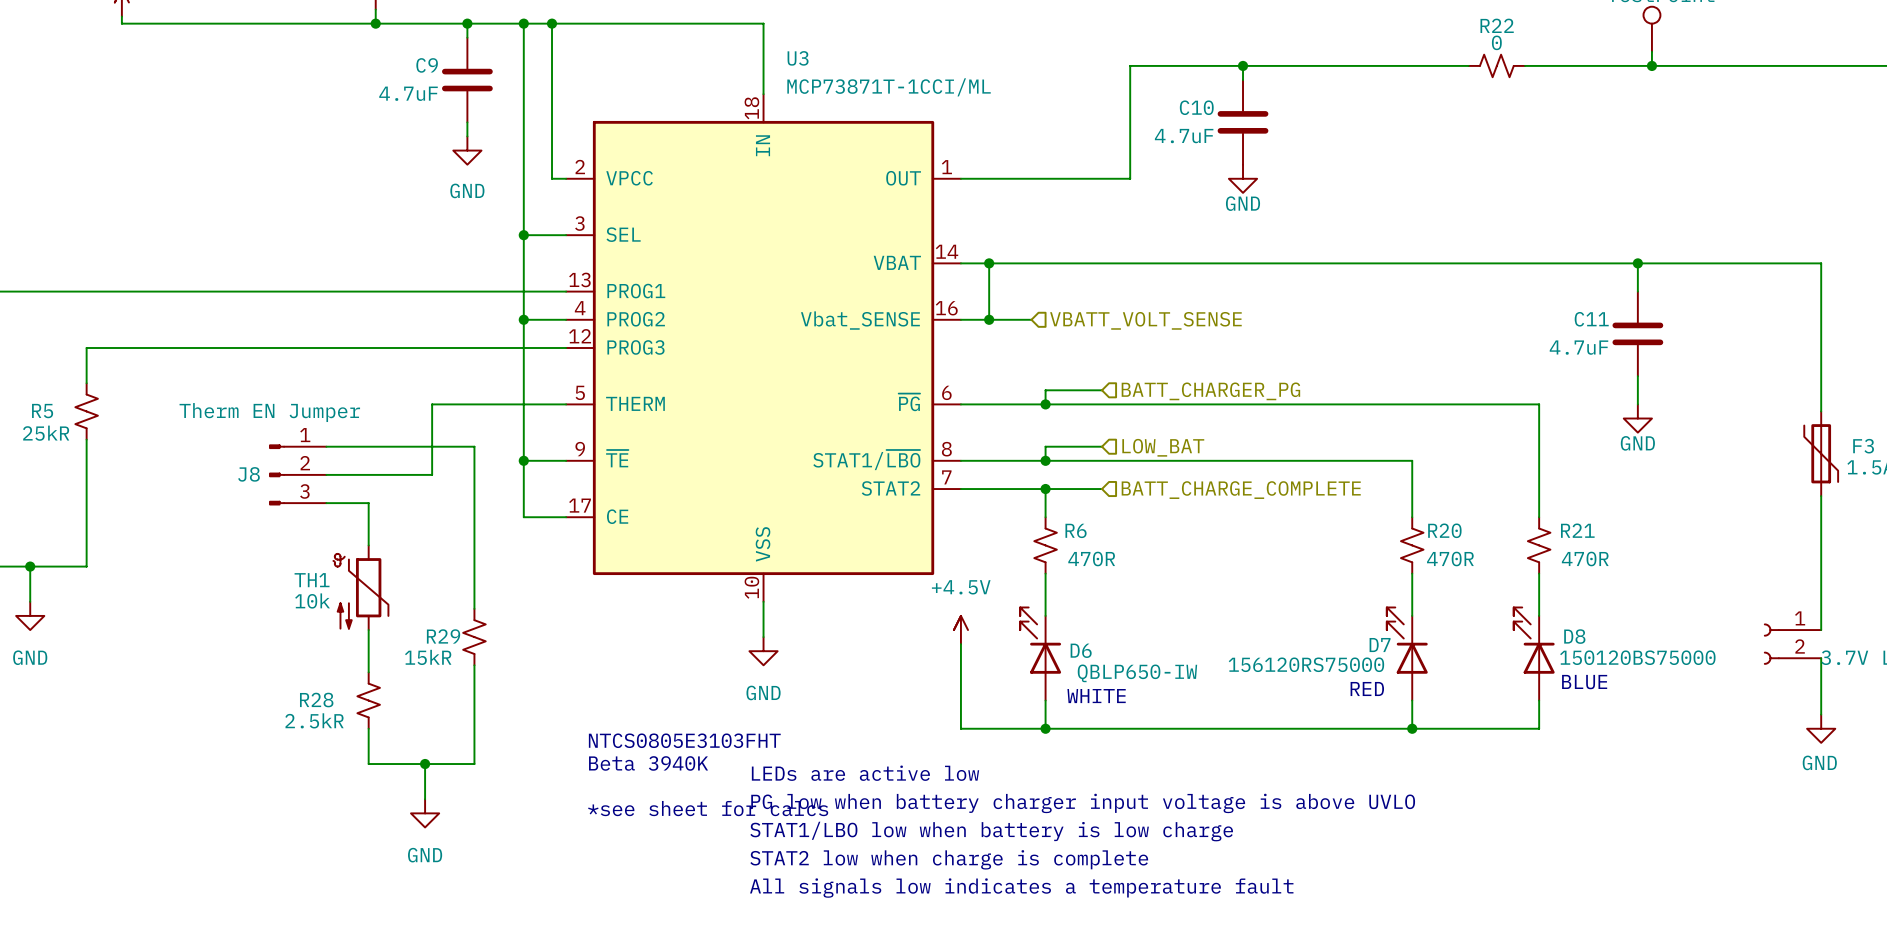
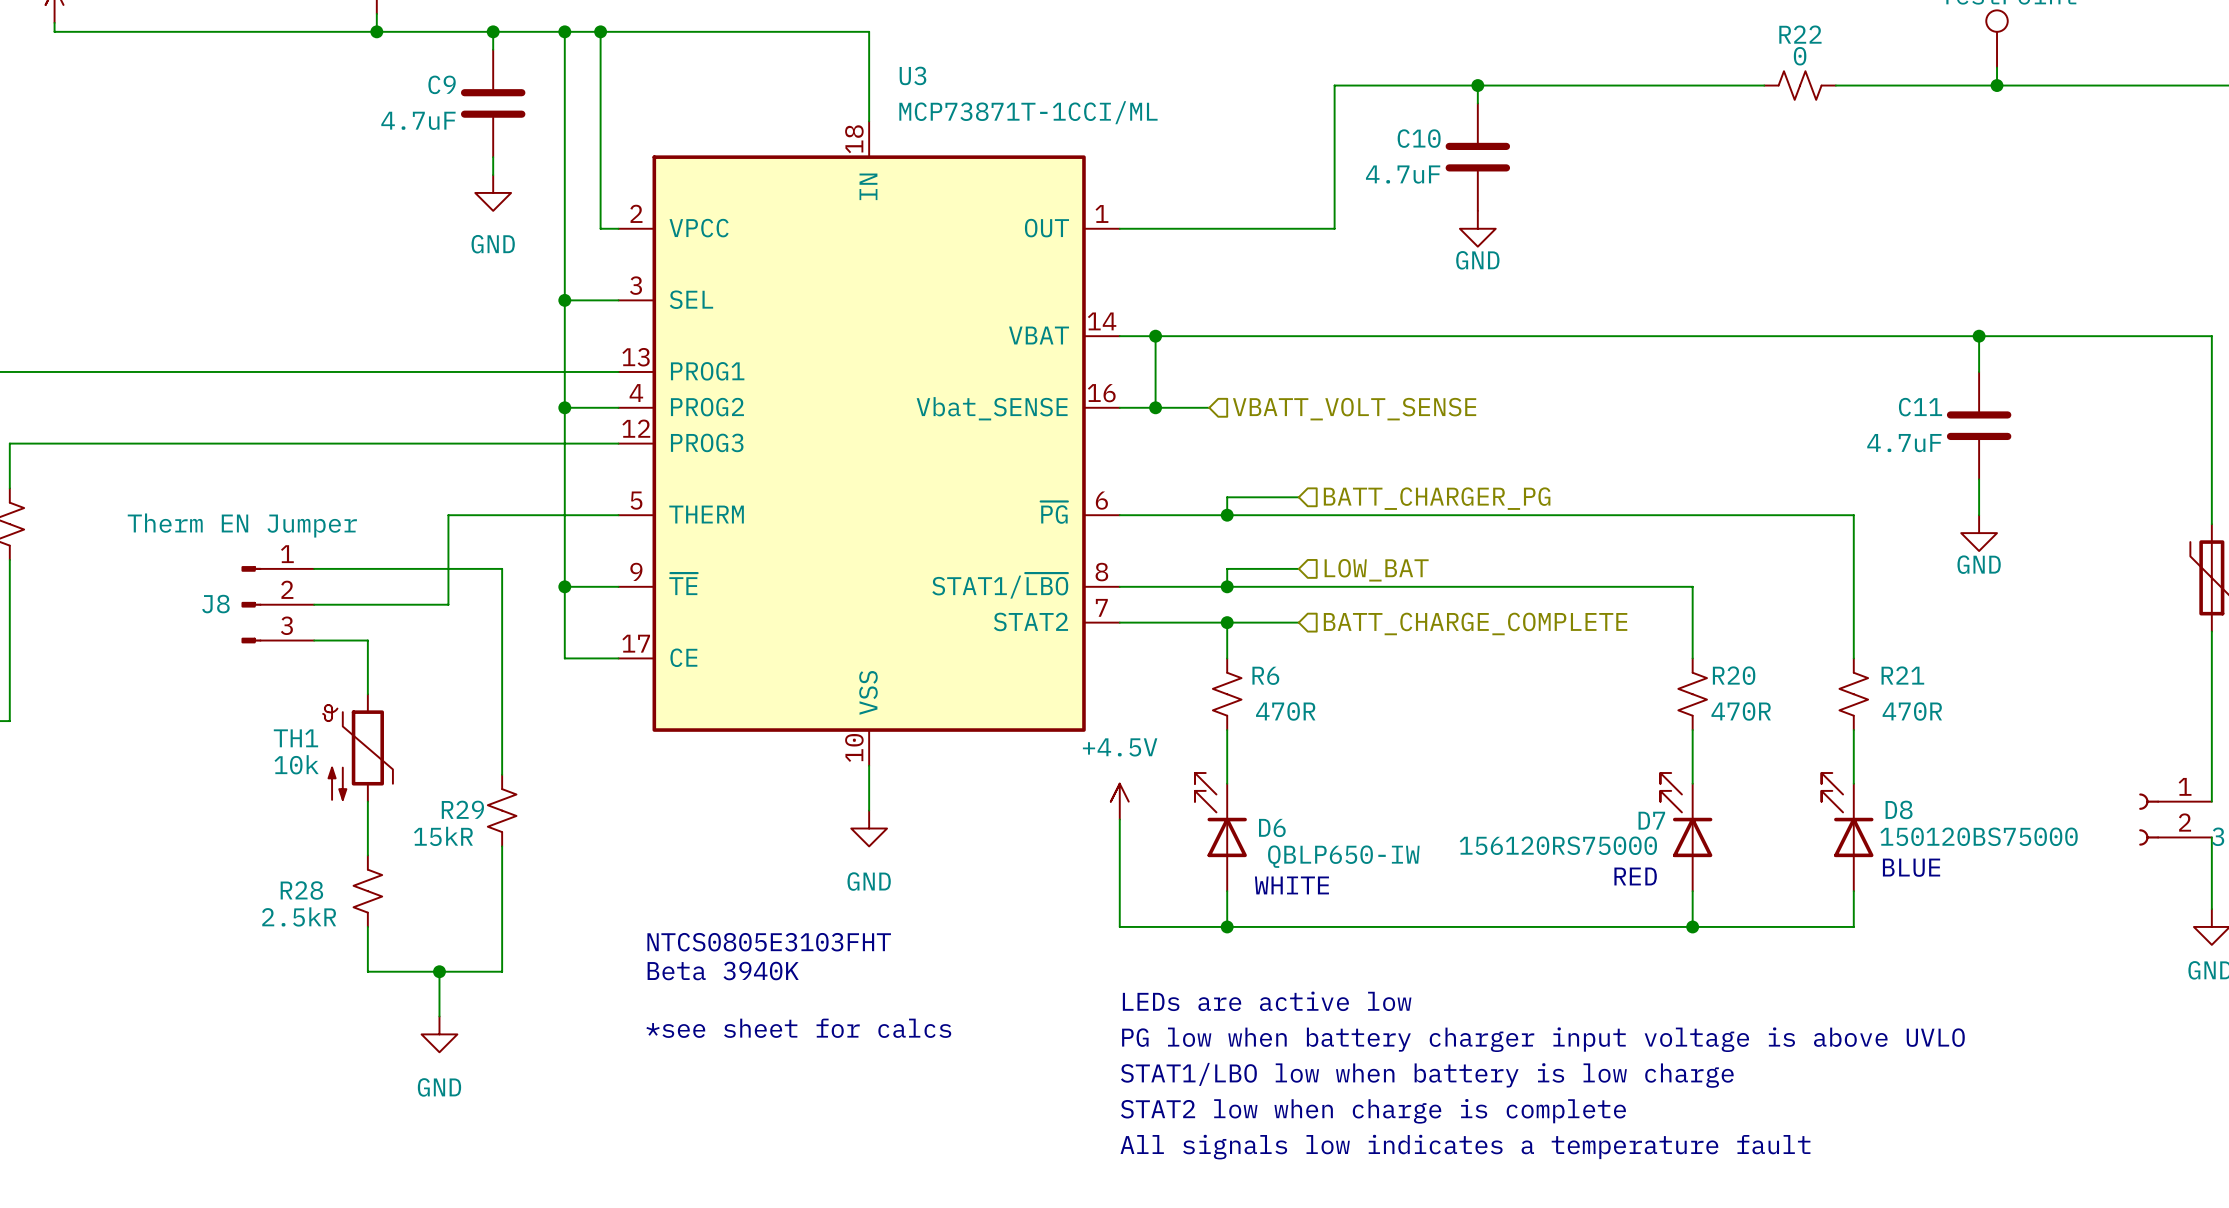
text position: LEDs are active low (865, 773) -> LEDs are active low (1267, 1001)
text position: PG low when battery charger input voltage is above UVLO (1083, 803) -> PG low when battery charger input voltage is above UVLO (1543, 1039)
text position: STAT1/LBO low when battery is low charge (991, 831) -> STAT1/LBO low when battery is low charge (1427, 1075)
text position: STAT2 low when charge is complete (949, 859) -> STAT2 low when charge is complete (1373, 1111)
text position: All signals low indicates a temperature fault (1021, 888) -> All signals low indicates a temperature fault (1465, 1147)

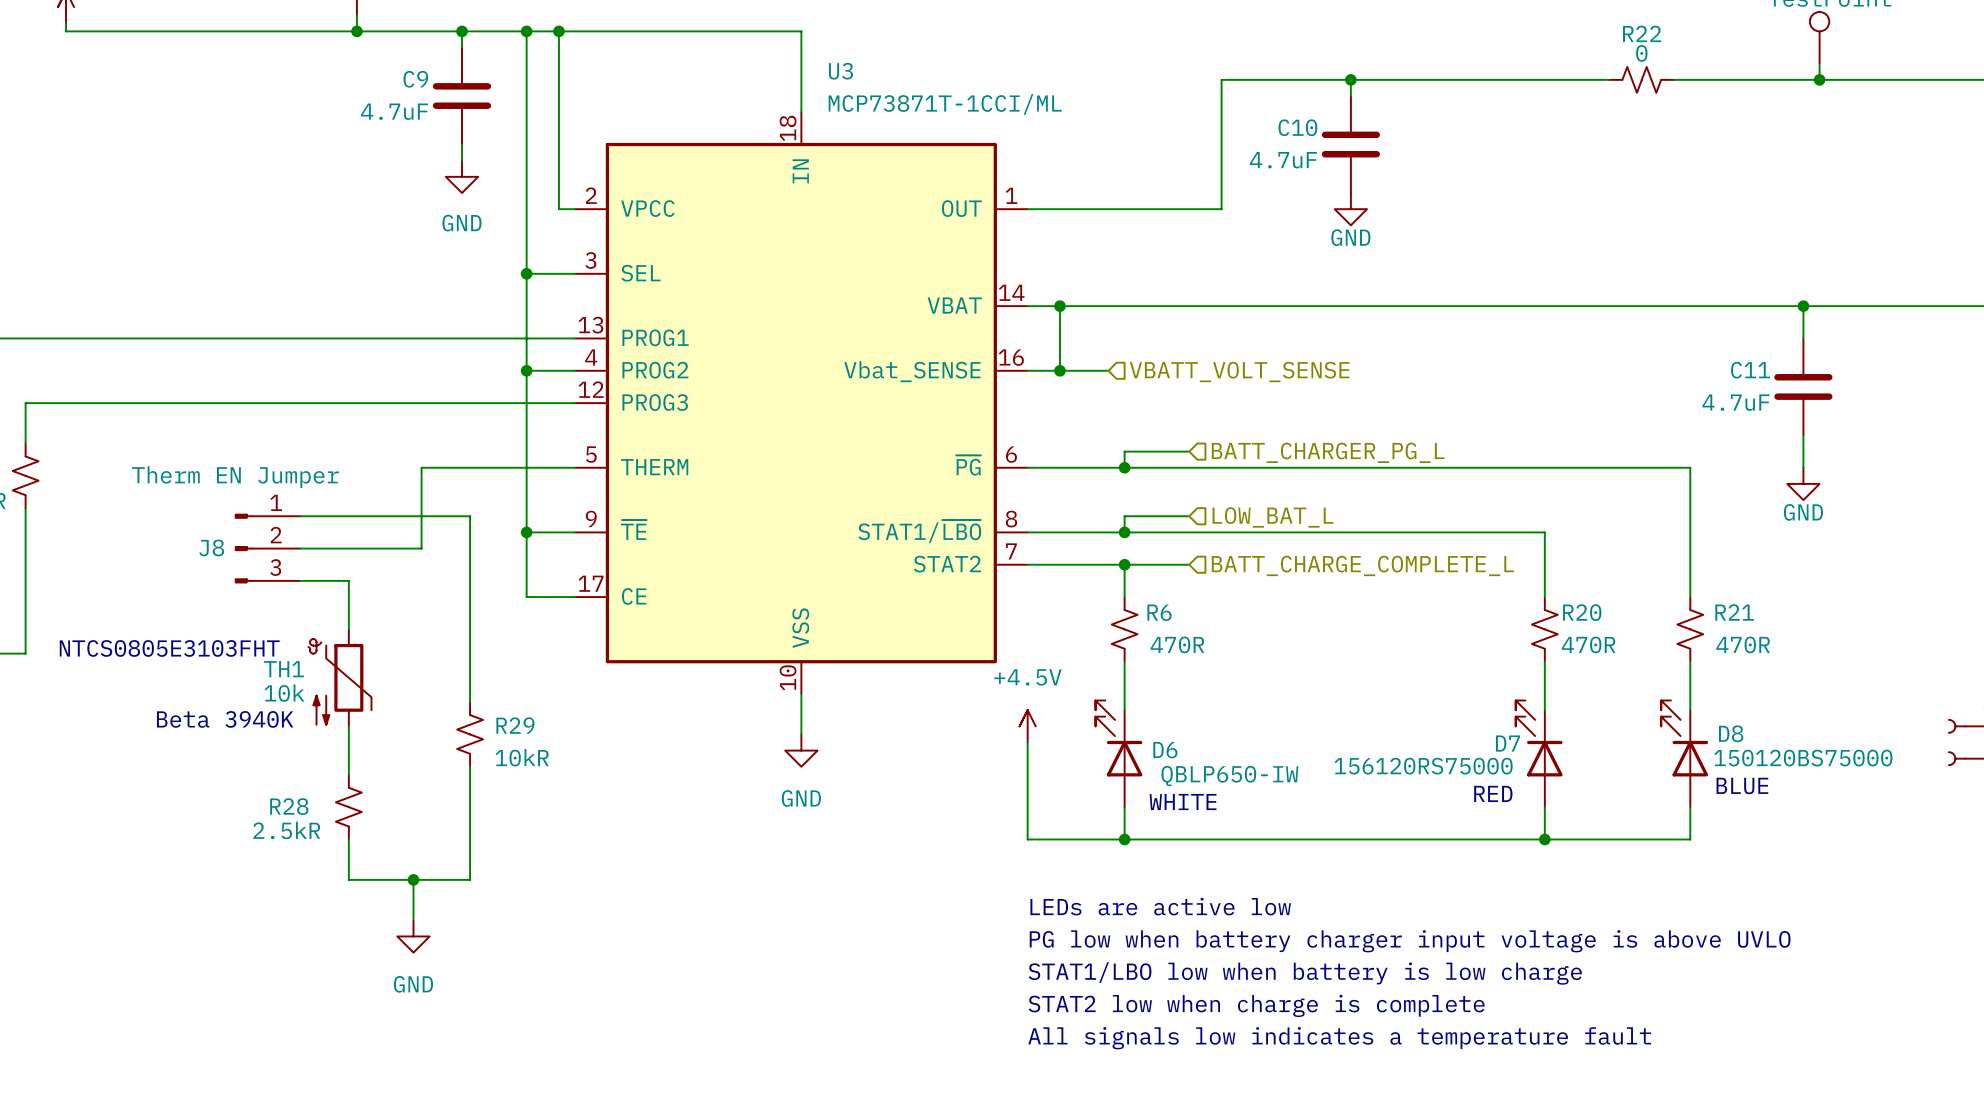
hierarchical label: BATT_CHARGER_PG (1437, 498) -> BATT_CHARGER_PG_L (1328, 452)
hierarchical label: LOW_BAT (1376, 570) -> LOW_BAT_L (1272, 517)
hierarchical label: BATT_CHARGE_COMPLETE (1475, 623) -> BATT_CHARGE_COMPLETE_L (1362, 565)
text: none -> NTCS0805E3103FHT (169, 648)
text: none -> Beta 3940K (225, 719)
R29 name position: R29 (462, 809) -> R29 (515, 725)
R29 value: 15kR (443, 836) -> 10kR (522, 757)
text: NTCS0805E3103FHT (769, 942) -> none
text: Beta 3940K (723, 971) -> none
text: *see sheet for calcs (798, 1028) -> none

